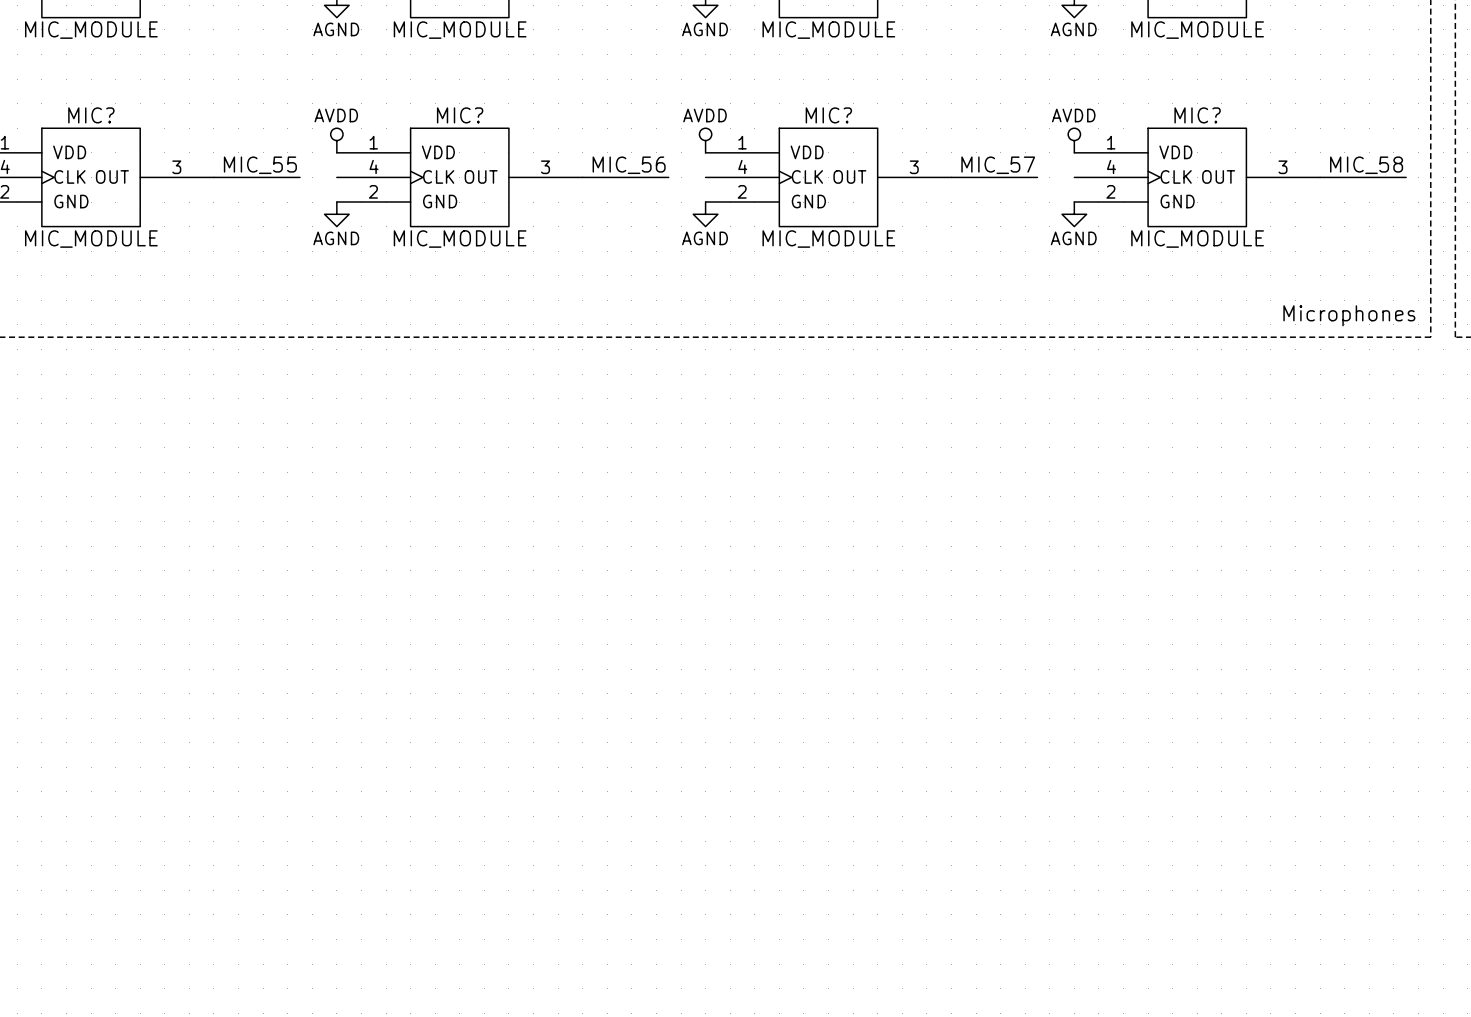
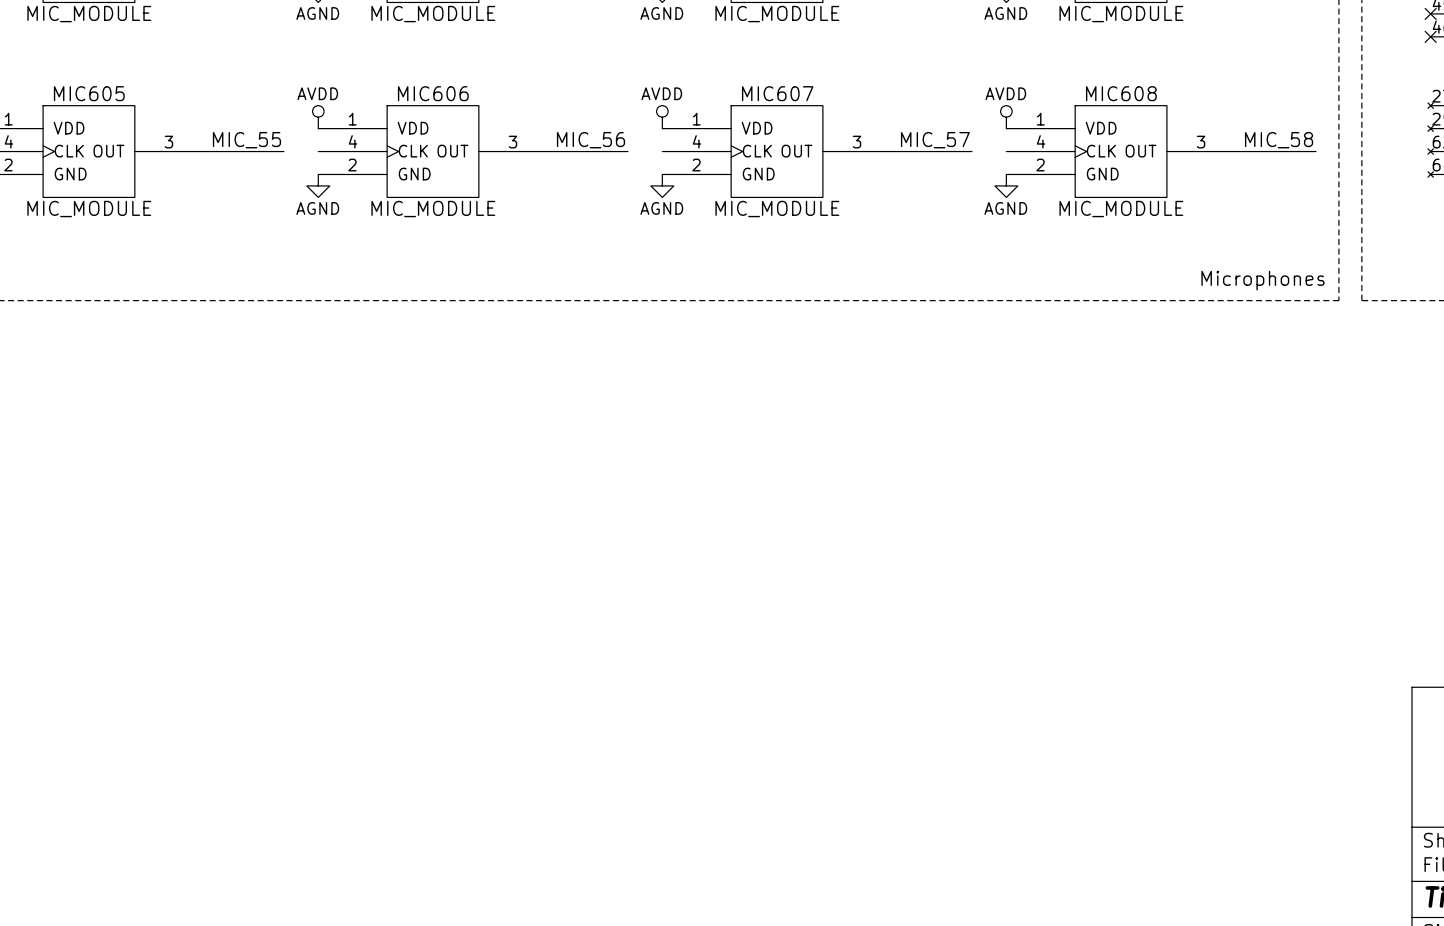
MIC? name: MIC? (91, 115) -> MIC605 (89, 93)
MIC? name: MIC? (460, 115) -> MIC606 (433, 93)
MIC? name: MIC? (828, 115) -> MIC607 (777, 93)
MIC? name: MIC? (1197, 115) -> MIC608 (1121, 93)

